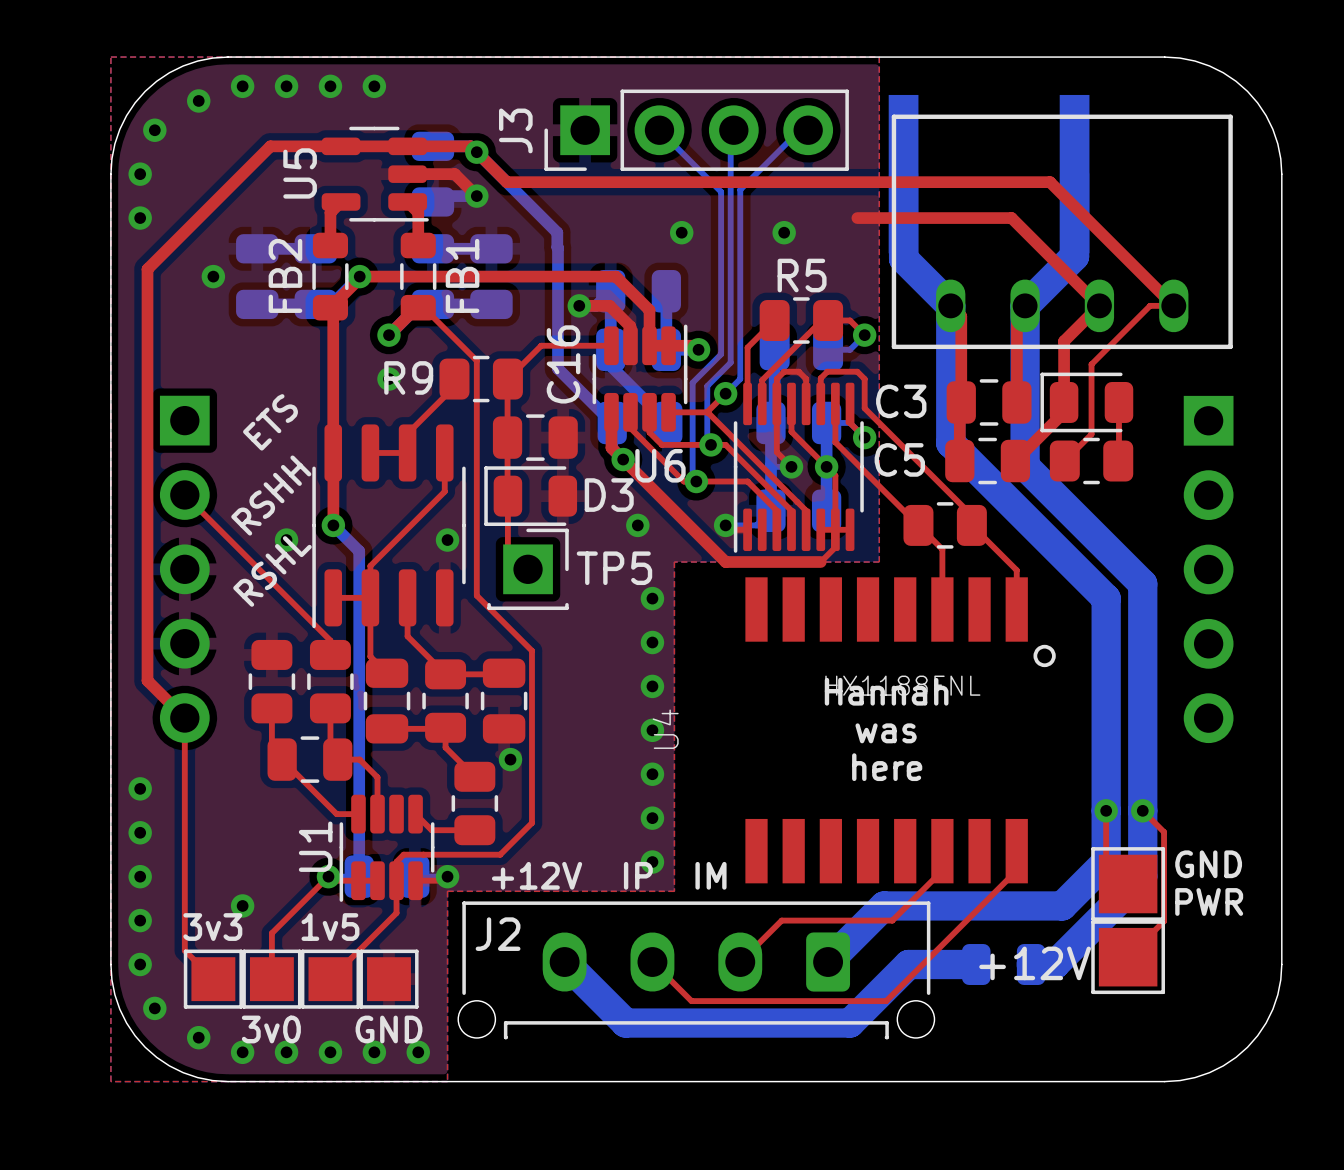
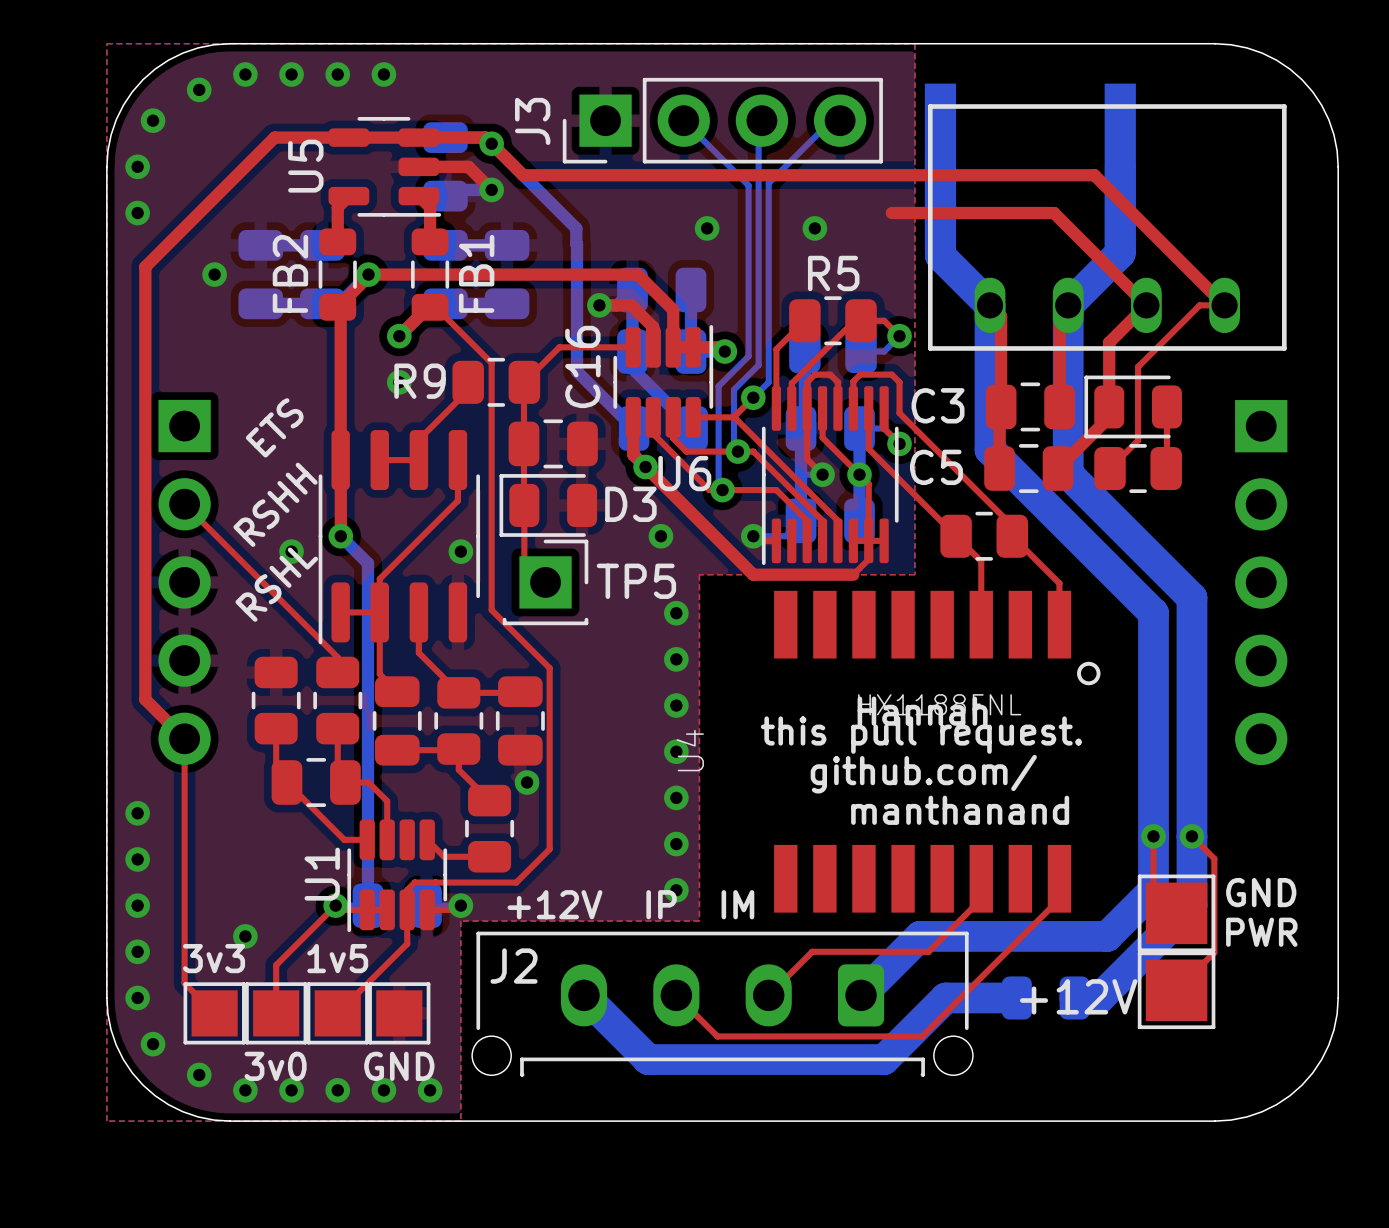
text: none -> this pull request. (921, 735)
text: was (886, 733) -> none
text: none -> github.com/ (923, 774)
text: here (887, 767) -> none
text: none -> manthanand (960, 810)

